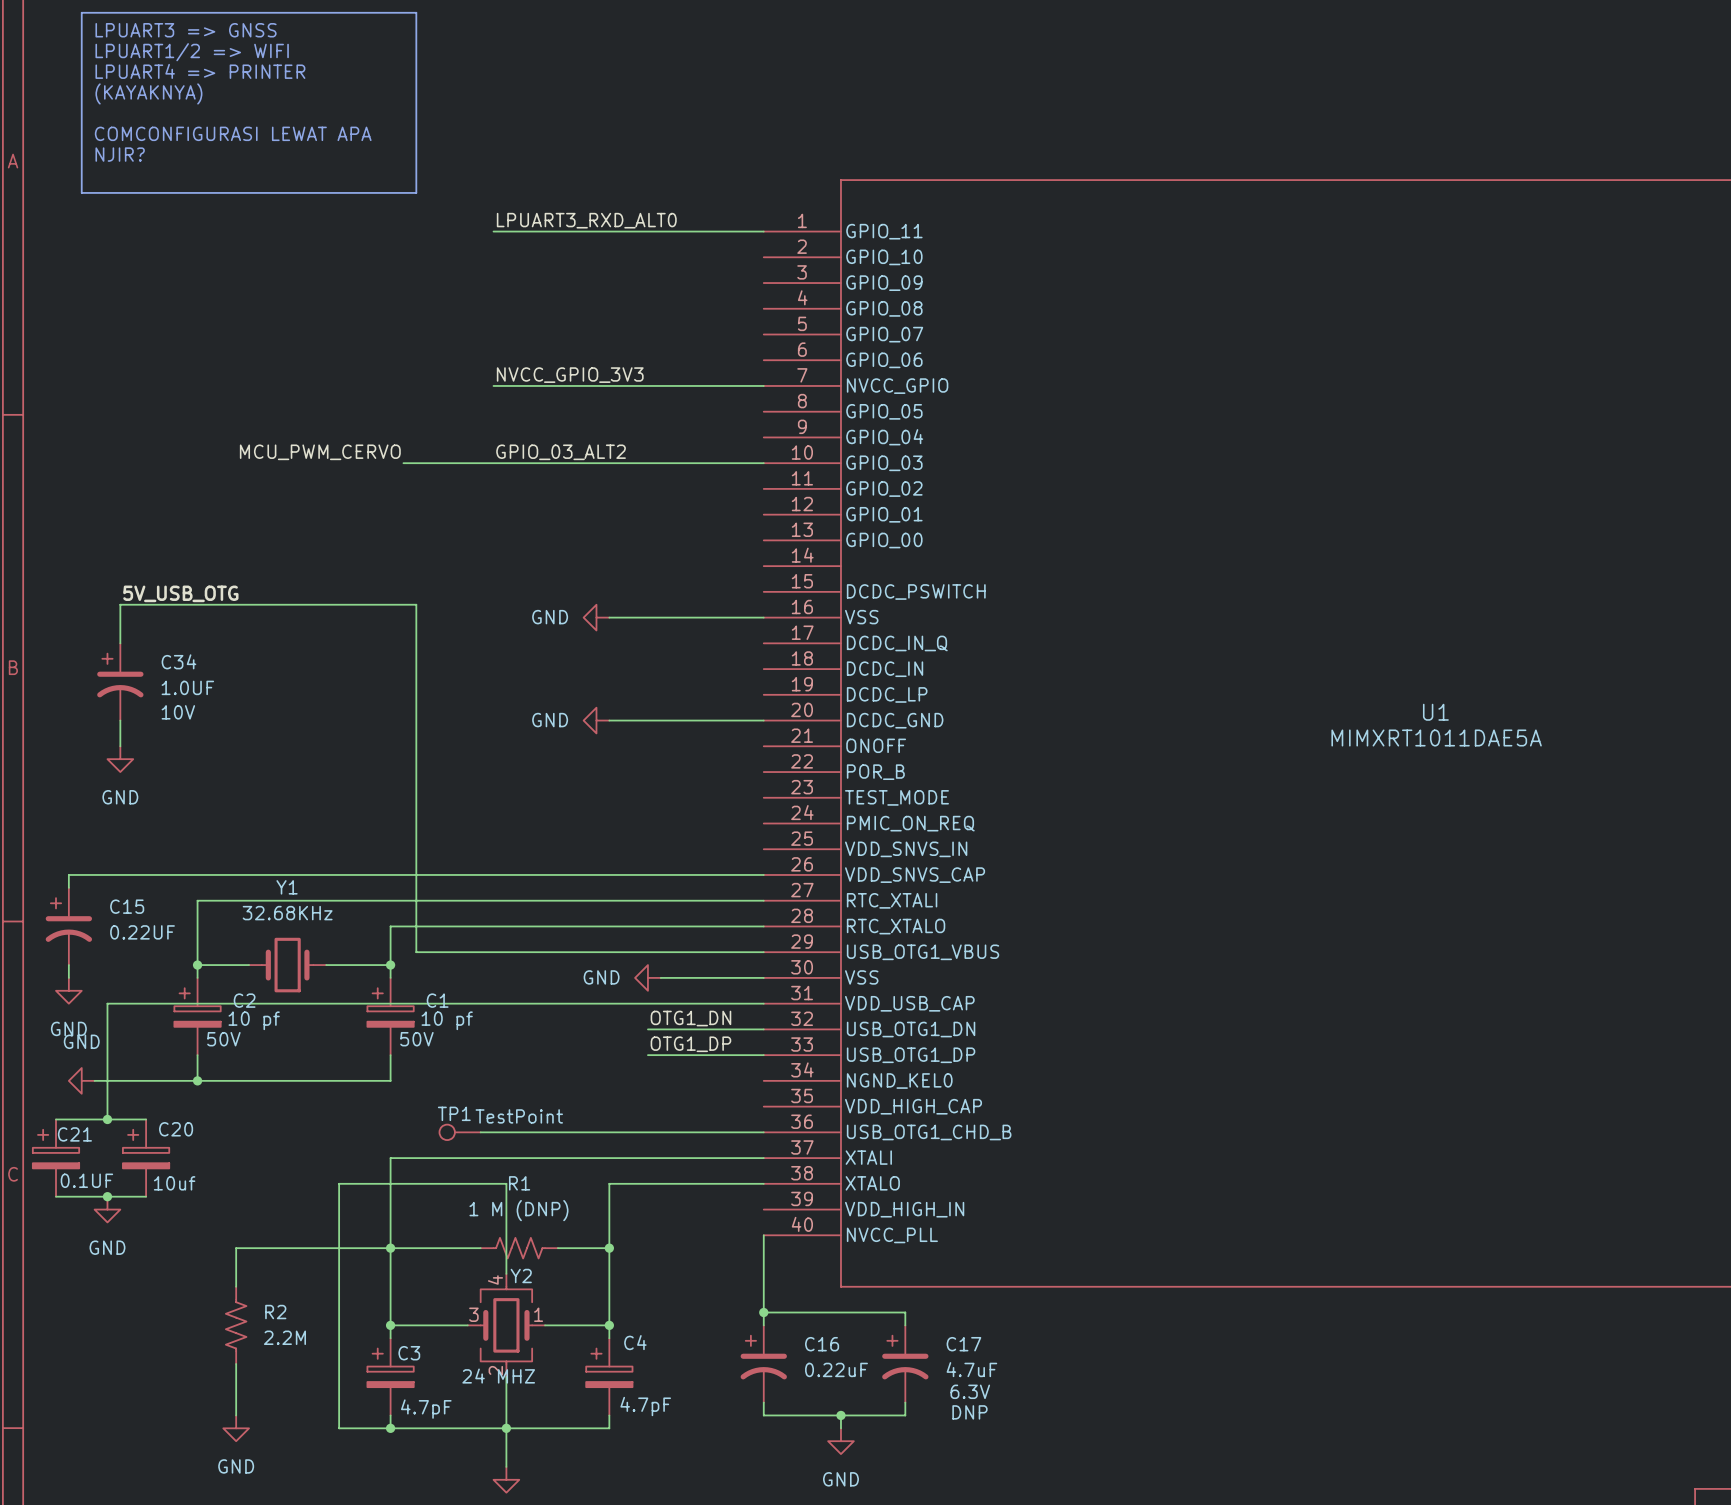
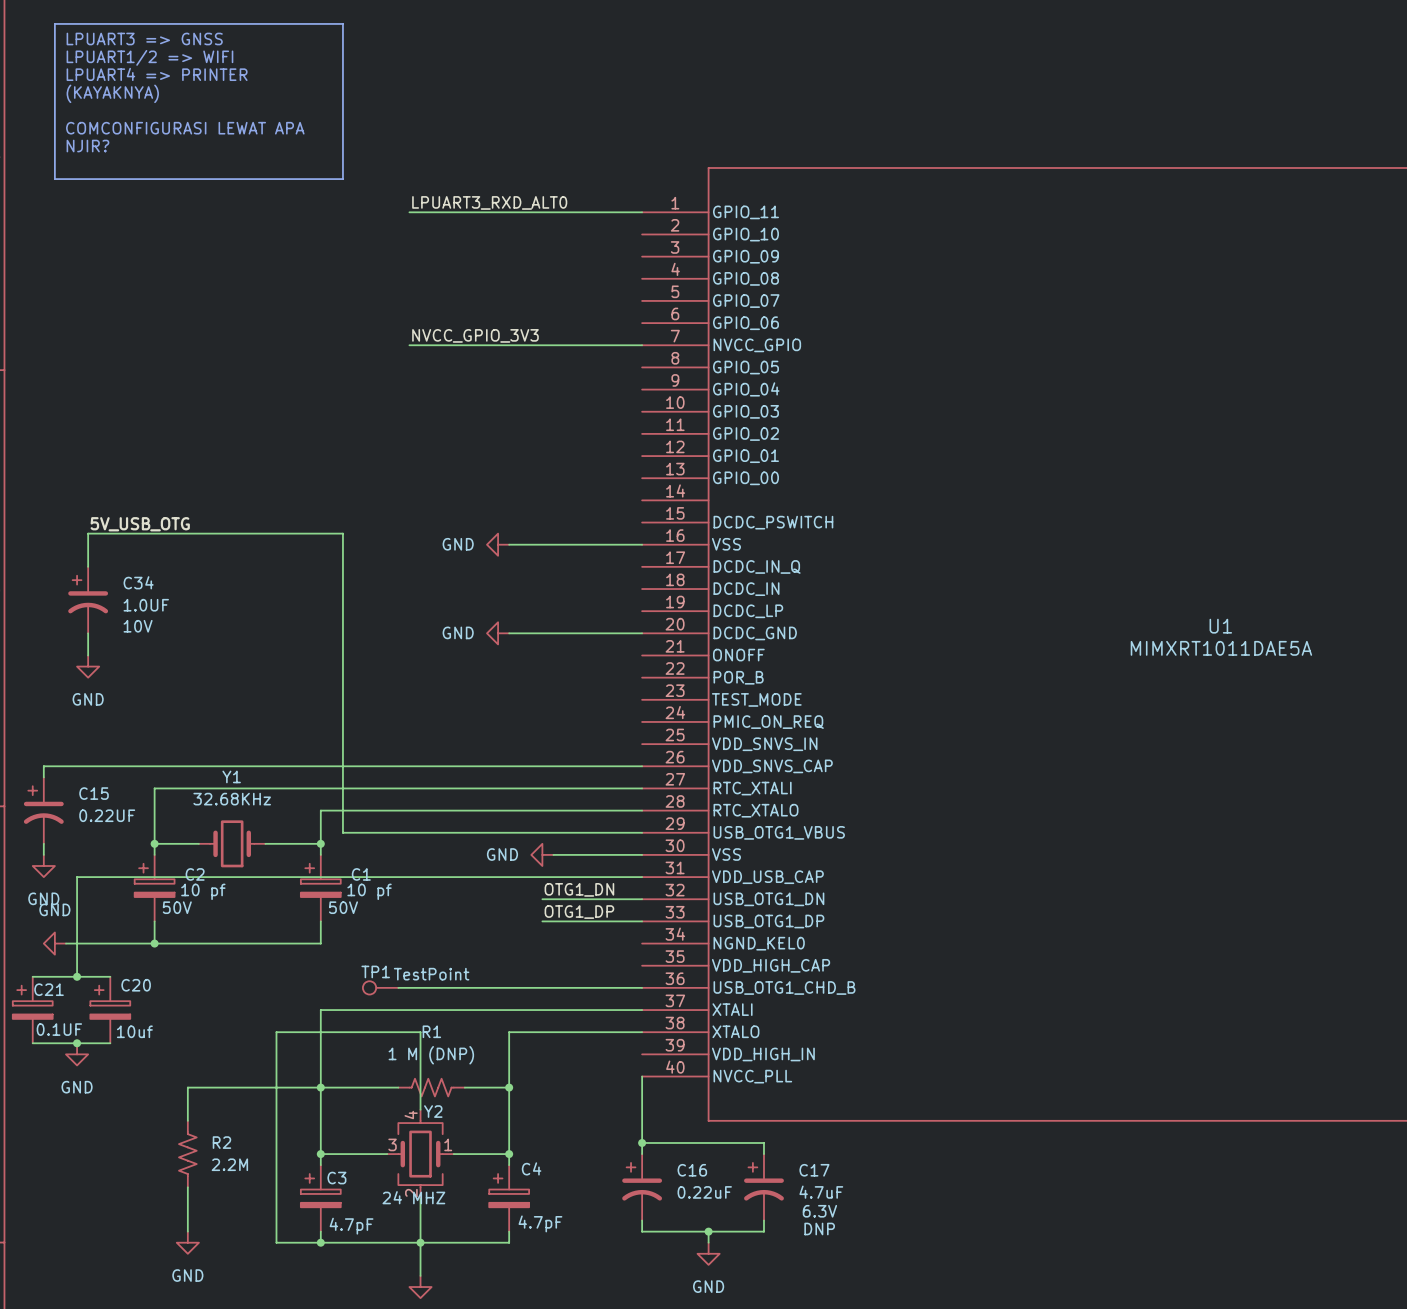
label: MCU_PWM_CERVO (320, 452) -> none
label: GPIO_03_ALT2 (561, 452) -> none
wire: (403, 463) (763, 463) -> none

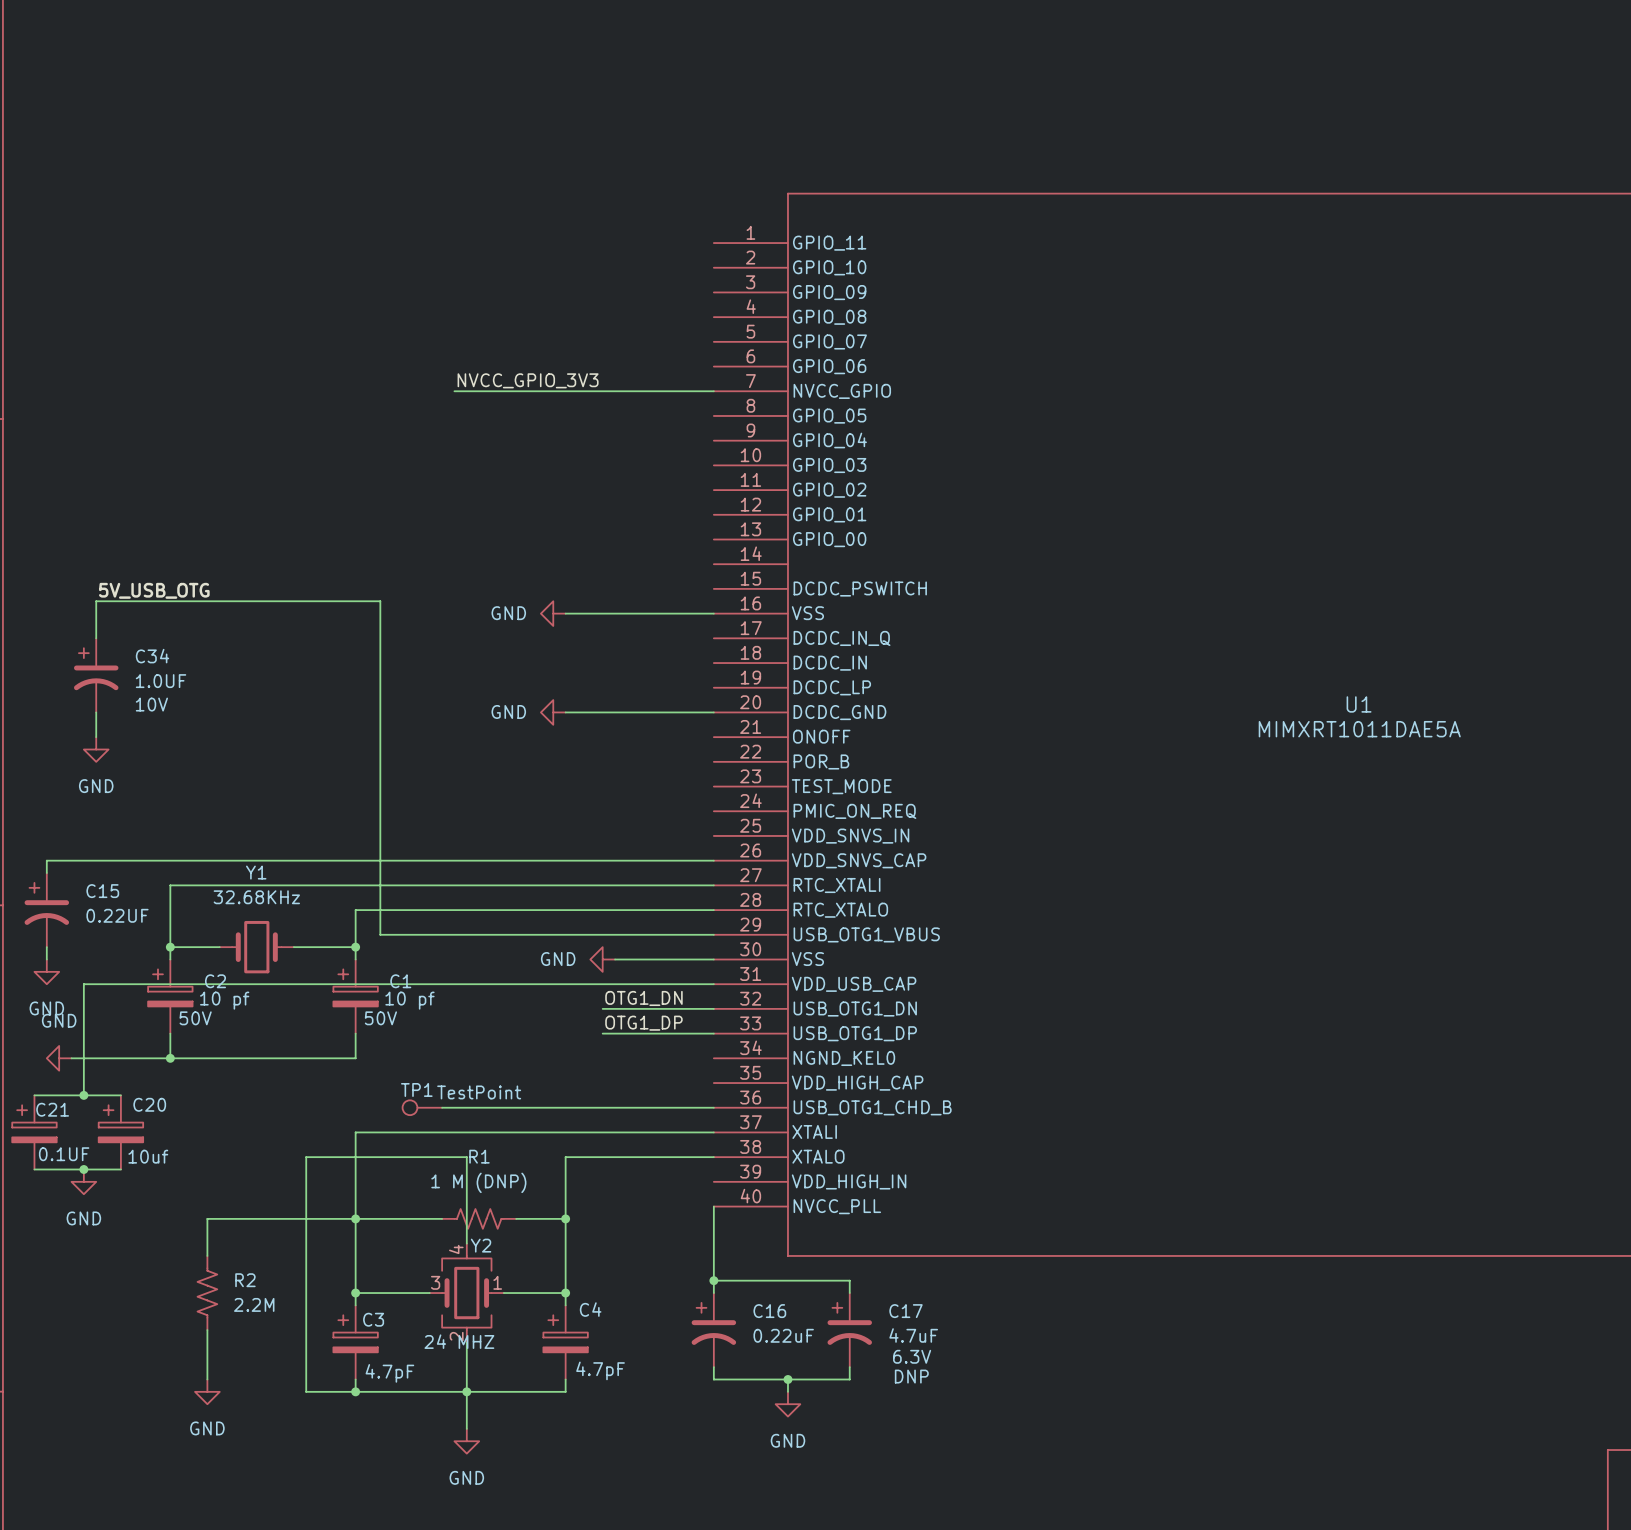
line: (54, 23) (342, 23) (342, 179) (54, 179) (54, 23) -> none
text: LPUART3 => GNSS (144, 39) -> none
text: LPUART1/2 => WIFI (149, 57) -> none
text: LPUART4 => PRINTER (157, 74) -> none
text: (KAYAKNYA) (112, 93) -> none
text: COMCONFIGURASI LEWAT APA (185, 128) -> none
text: NJIR? (87, 146) -> none
label: LPUART3_RXD_ALT0 (489, 202) -> none
wire: (409, 212) (642, 212) -> none

